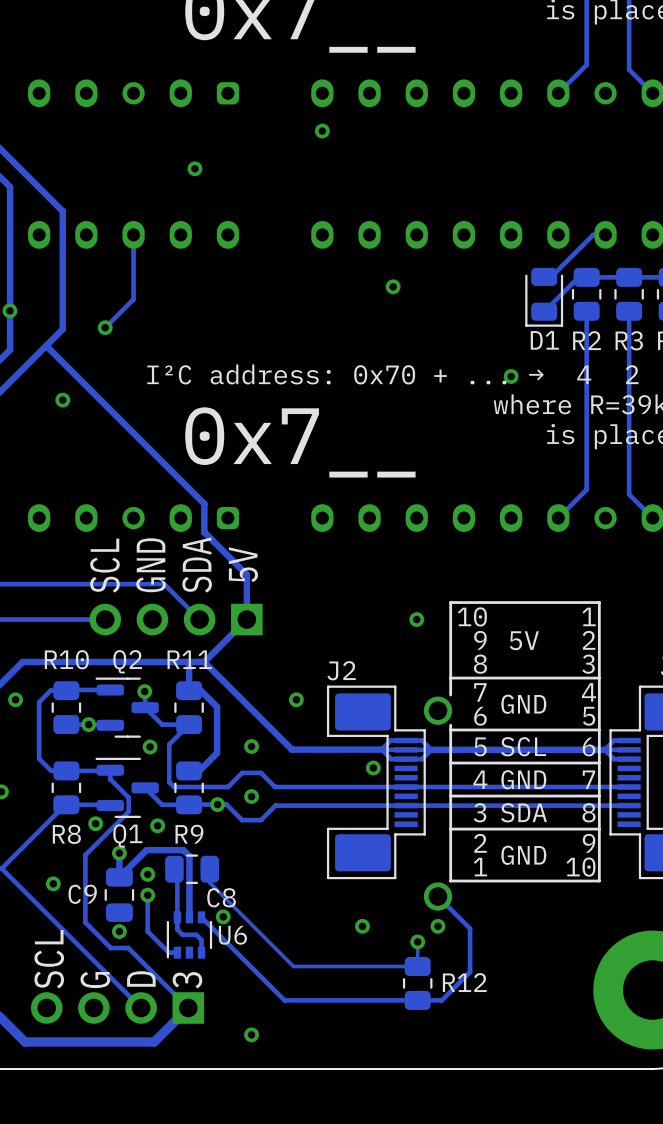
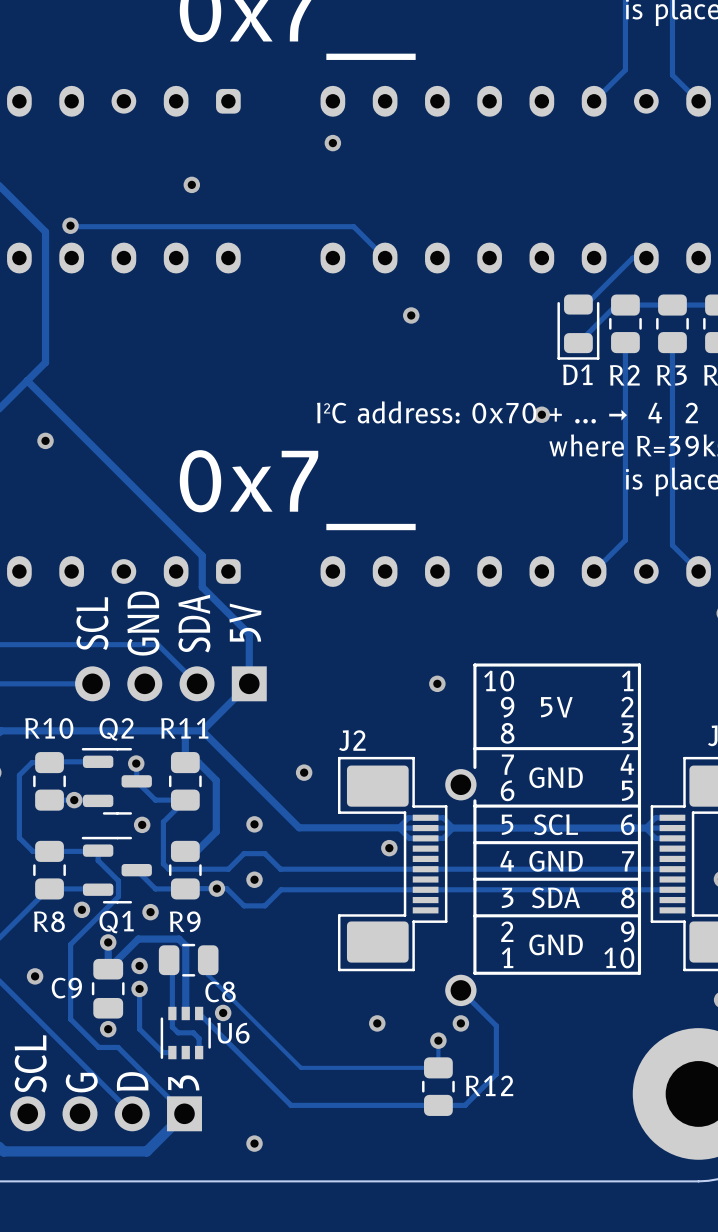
track: none -> (70, 225) (353, 226) (385, 258)
via: none -> (70, 225)
track: (133, 234) (133, 299) (105, 327) -> none
via: (105, 327) -> none

